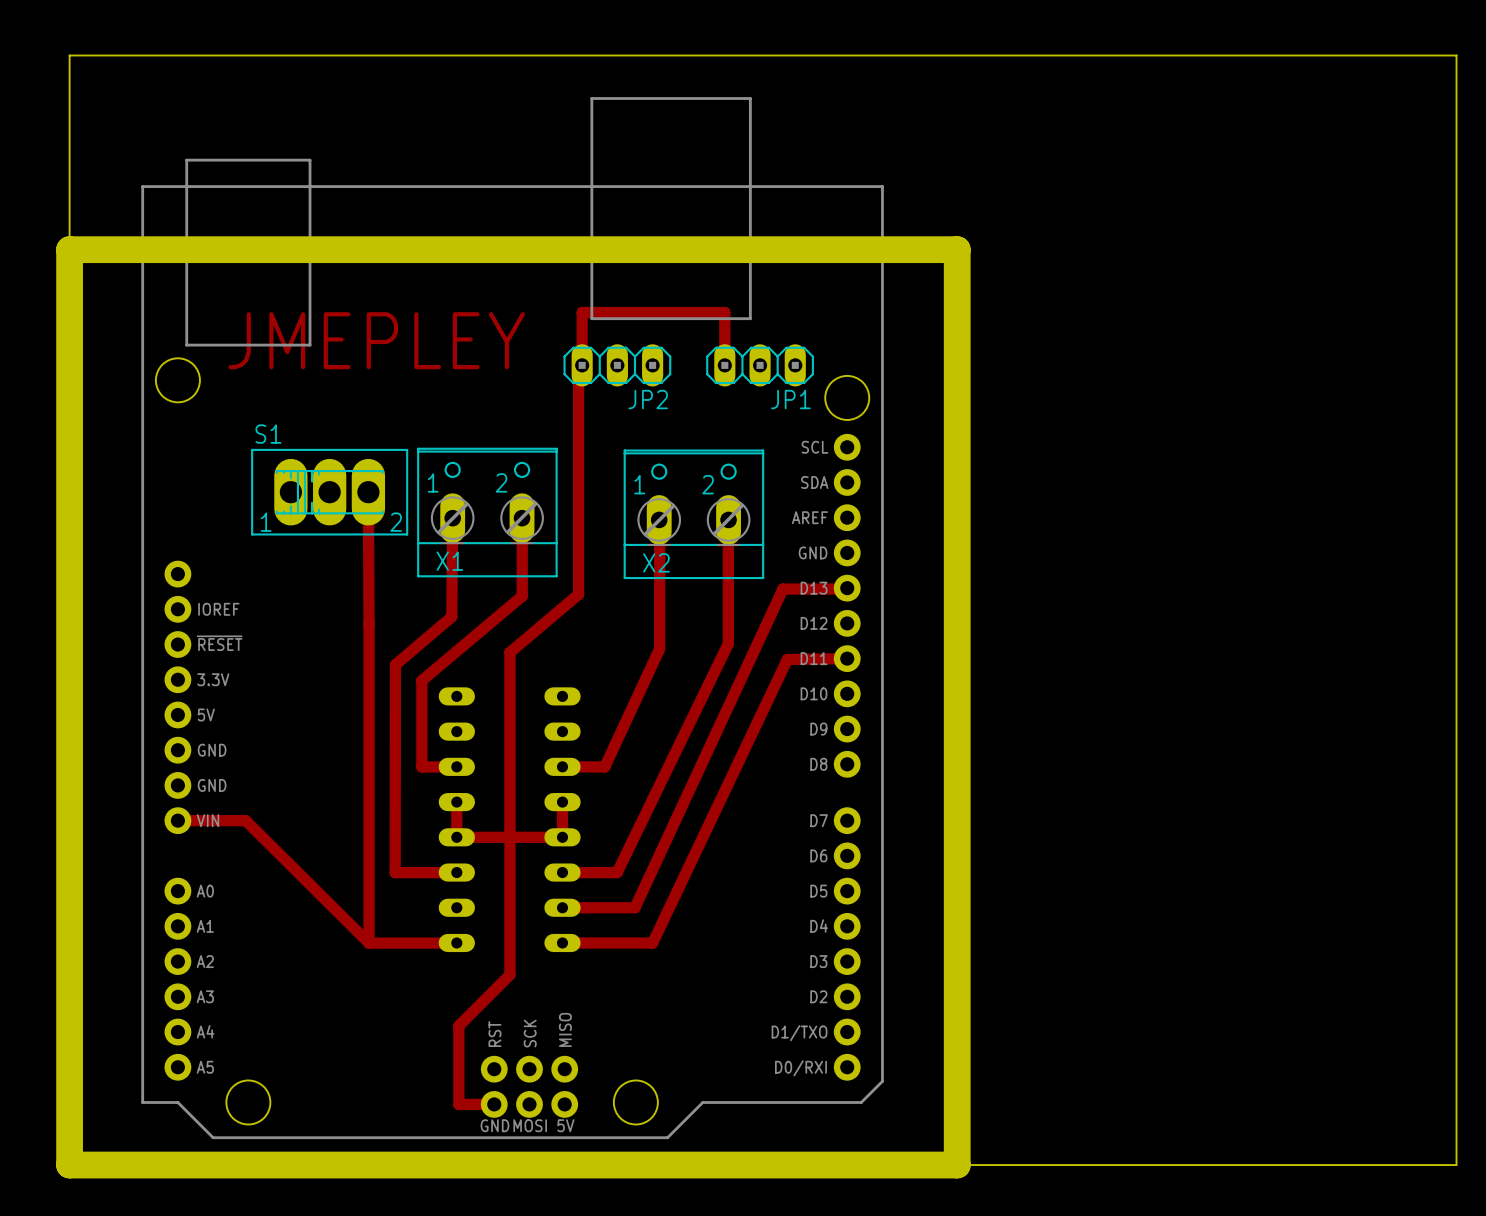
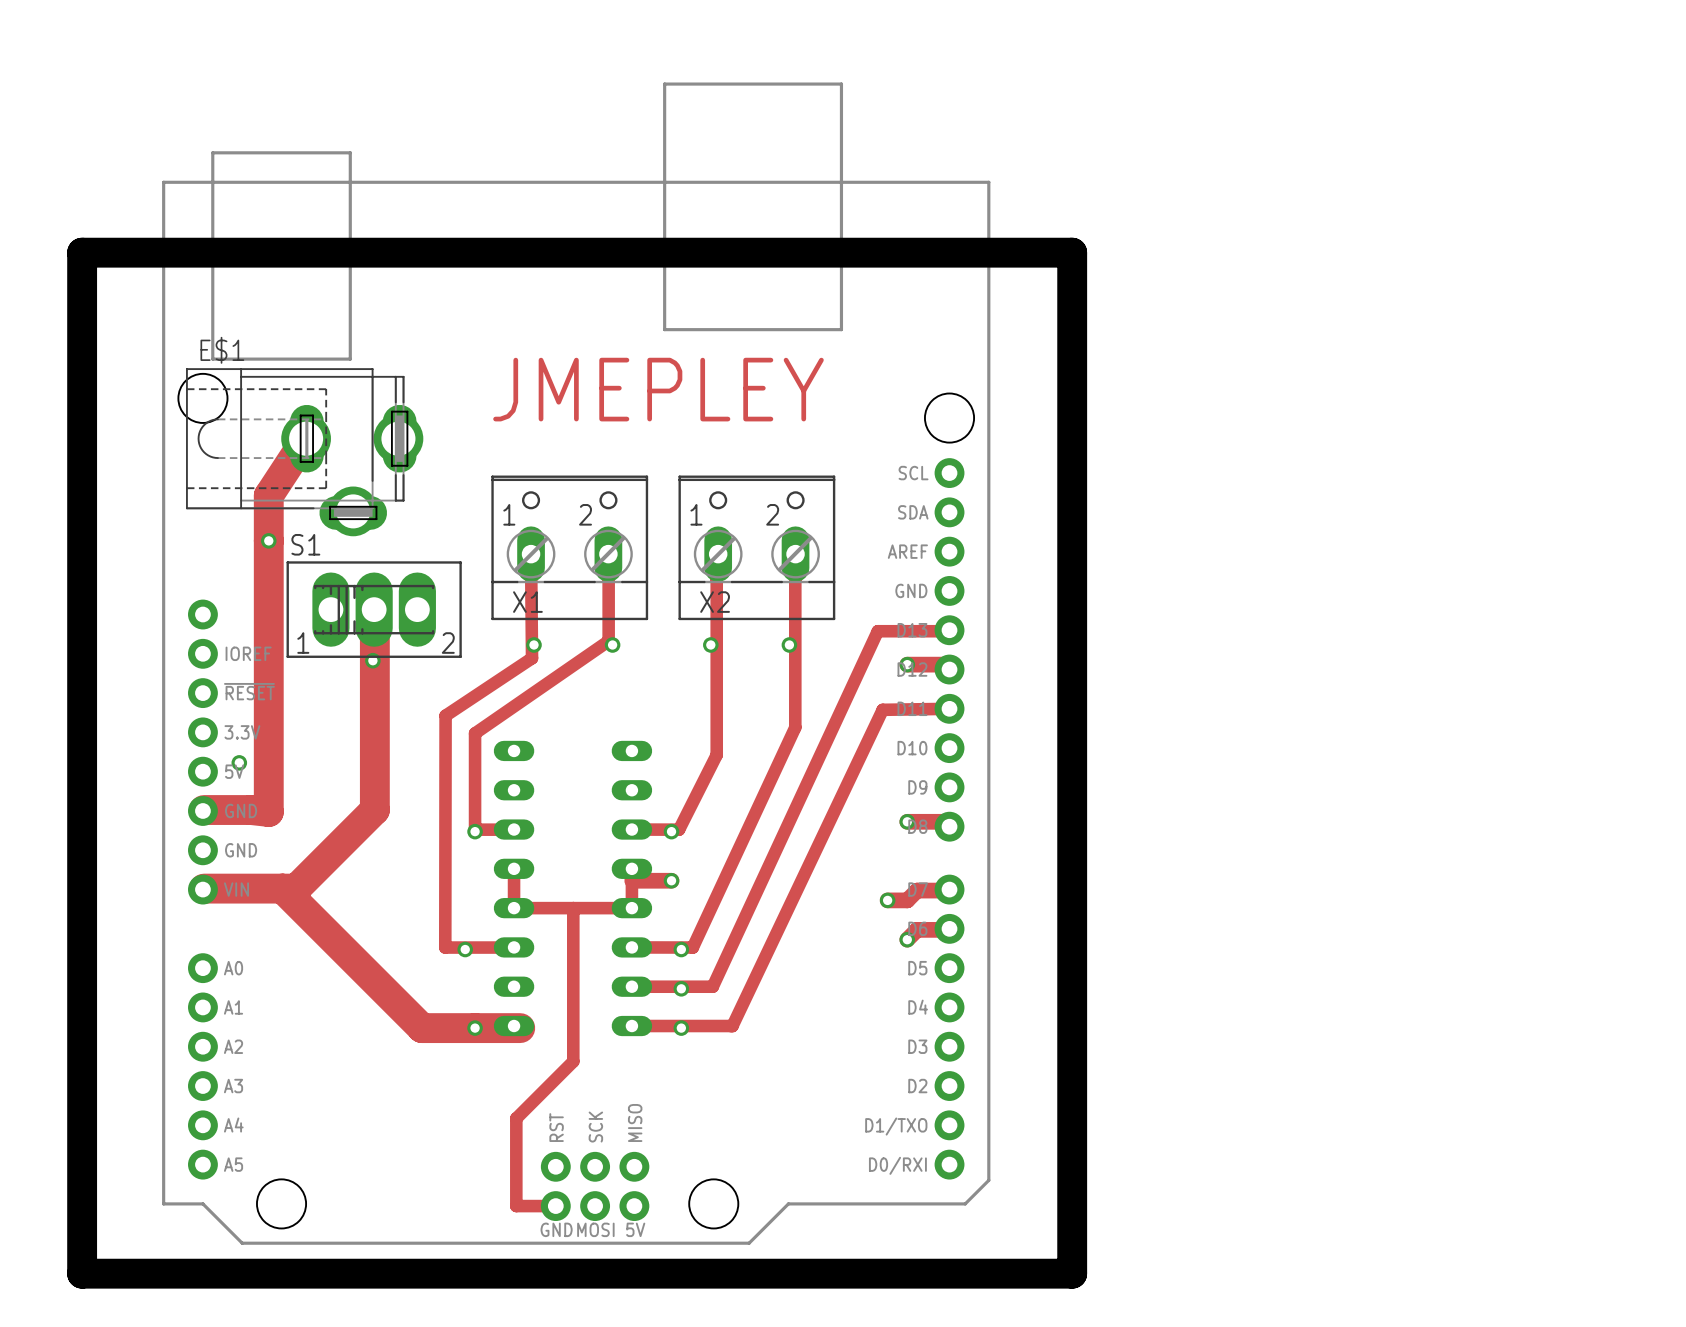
board edge: (69, 249) (69, 55) (1456, 55) (1456, 1165) (957, 1165) -> none
text position: JMEPLEY (376, 340) -> JMEPLEY (658, 389)
JP2: (617, 365) -> none
track: (724, 365) (724, 312) (582, 312) (582, 365) (578, 368) (578, 594) (509, 652) (509, 837) -> none
JP1: (760, 365) -> none
track: none -> (306, 438) (268, 495) (268, 811) (203, 810)
E$1: none -> (304, 452)
S1 position: (329, 492) -> (374, 609)
track: (368, 492) (369, 943) -> none
via: none -> (268, 540)
X1 position: (487, 512) -> (569, 547)
X2 position: (693, 514) -> (756, 547)
track: (452, 518) (451, 616) (395, 664) -> (531, 554) (532, 658) (445, 715)
track: (522, 518) (522, 596) (421, 680) -> (608, 554) (608, 641) (475, 733)
track: (659, 519) (659, 648) (604, 766) -> (718, 554) (716, 755) (679, 829)
track: (728, 519) (728, 643) (617, 872) -> (795, 554) (795, 727) (692, 947)
track: none -> (374, 609) (374, 810) (296, 888) (203, 888)
via: none -> (534, 644)
via: none -> (612, 644)
via: none -> (710, 644)
via: none -> (789, 644)
via: none -> (372, 660)
track: none -> (907, 664) (946, 664)
via: none -> (907, 664)
via: none -> (239, 762)
track: none -> (907, 821) (946, 821)
via: none -> (907, 821)
via: none -> (475, 831)
via: none -> (671, 831)
track: none -> (632, 880) (671, 880)
via: none -> (671, 880)
track: none -> (282, 888) (422, 1028) (520, 1028)
track: none -> (946, 890) (917, 890) (907, 900) (887, 900)
via: none -> (887, 900)
track: none -> (946, 929) (917, 929) (907, 939)
via: none -> (907, 939)
via: none -> (465, 949)
via: none -> (681, 949)
via: none -> (681, 988)
via: none -> (475, 1028)
via: none -> (681, 1028)

